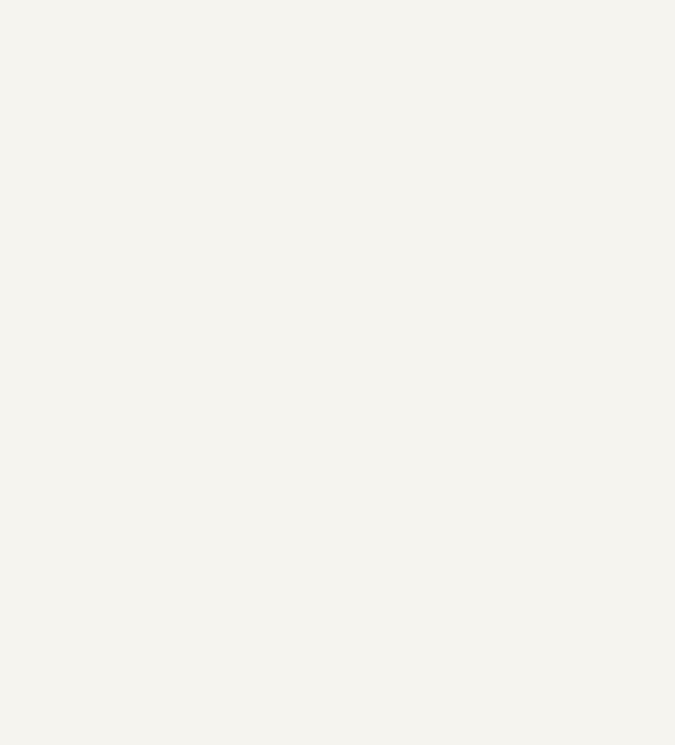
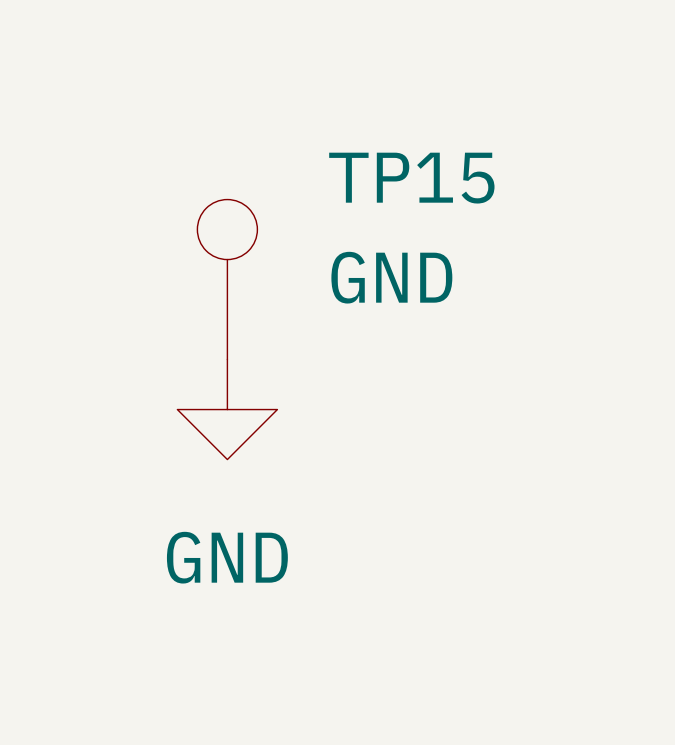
TP15: none -> GND (227, 279)
power symbol: none -> GND (227, 409)

